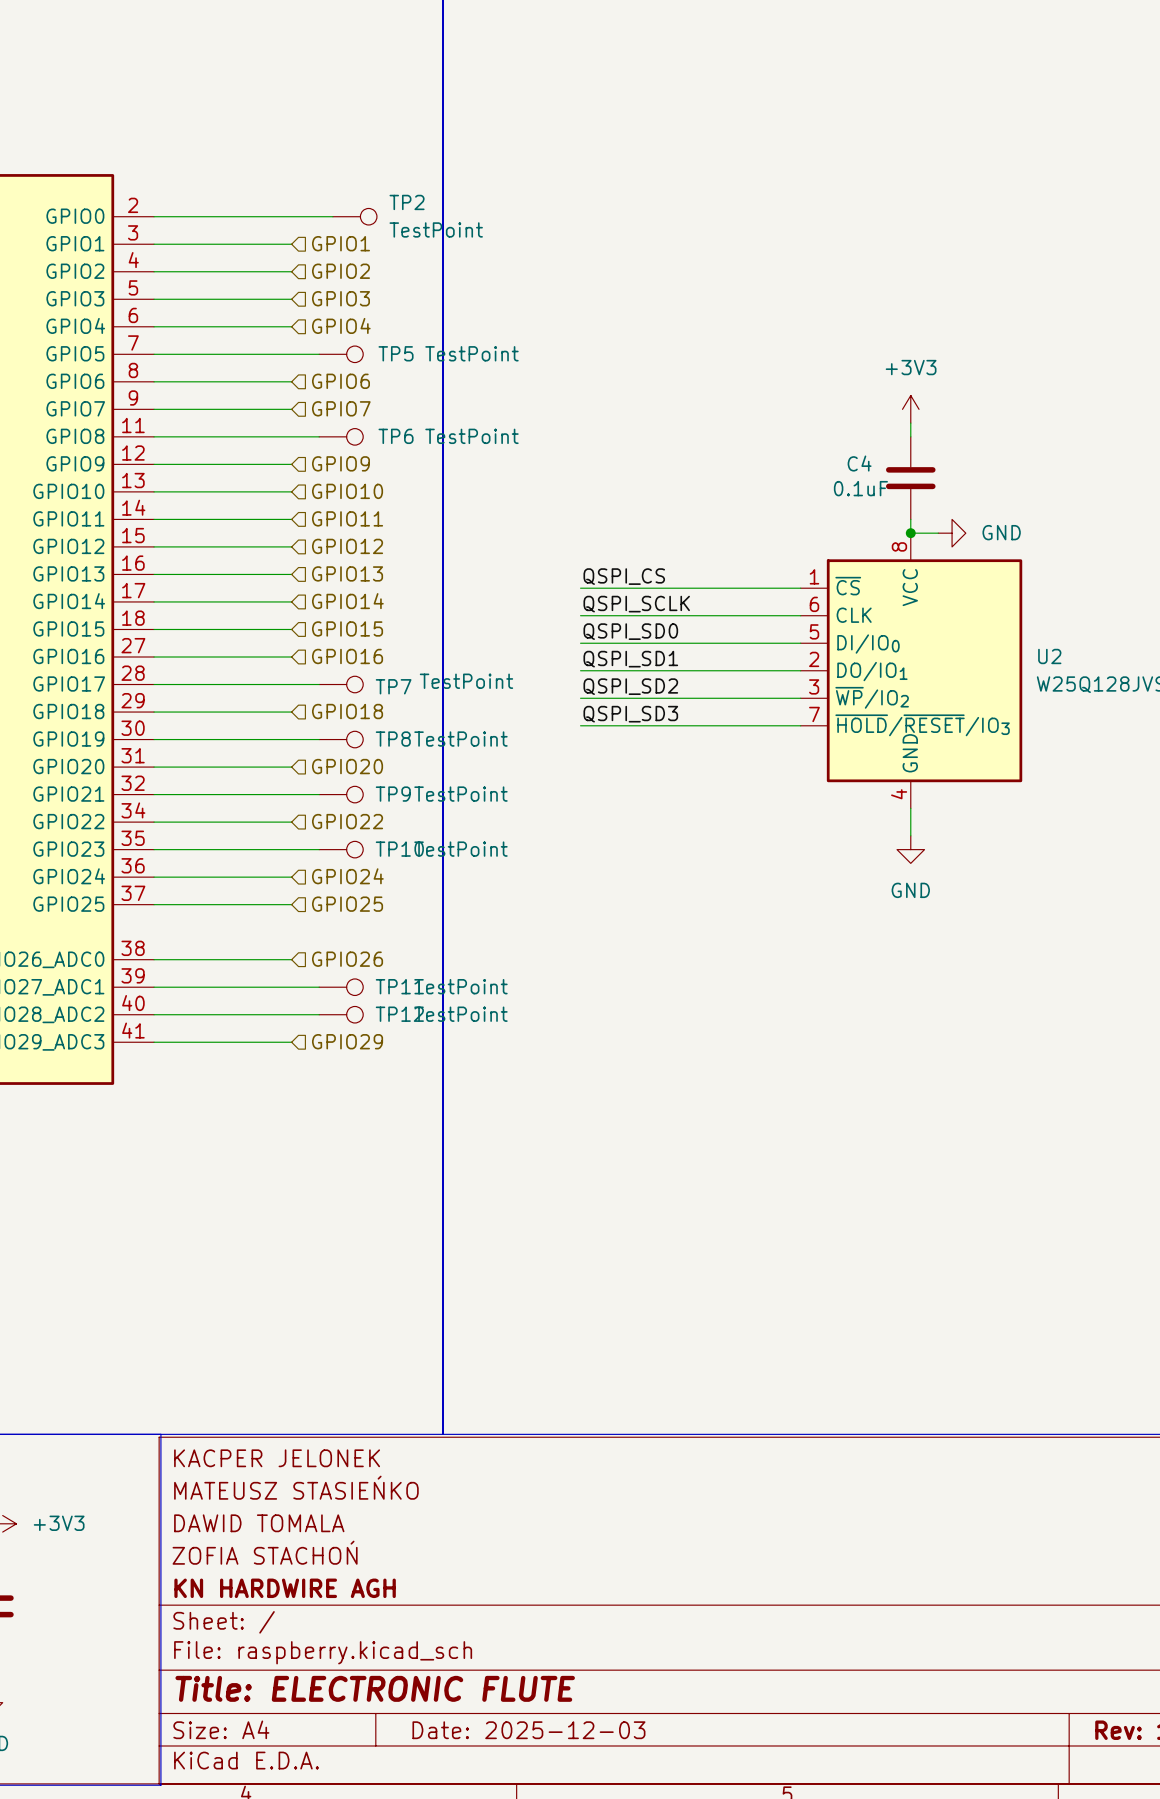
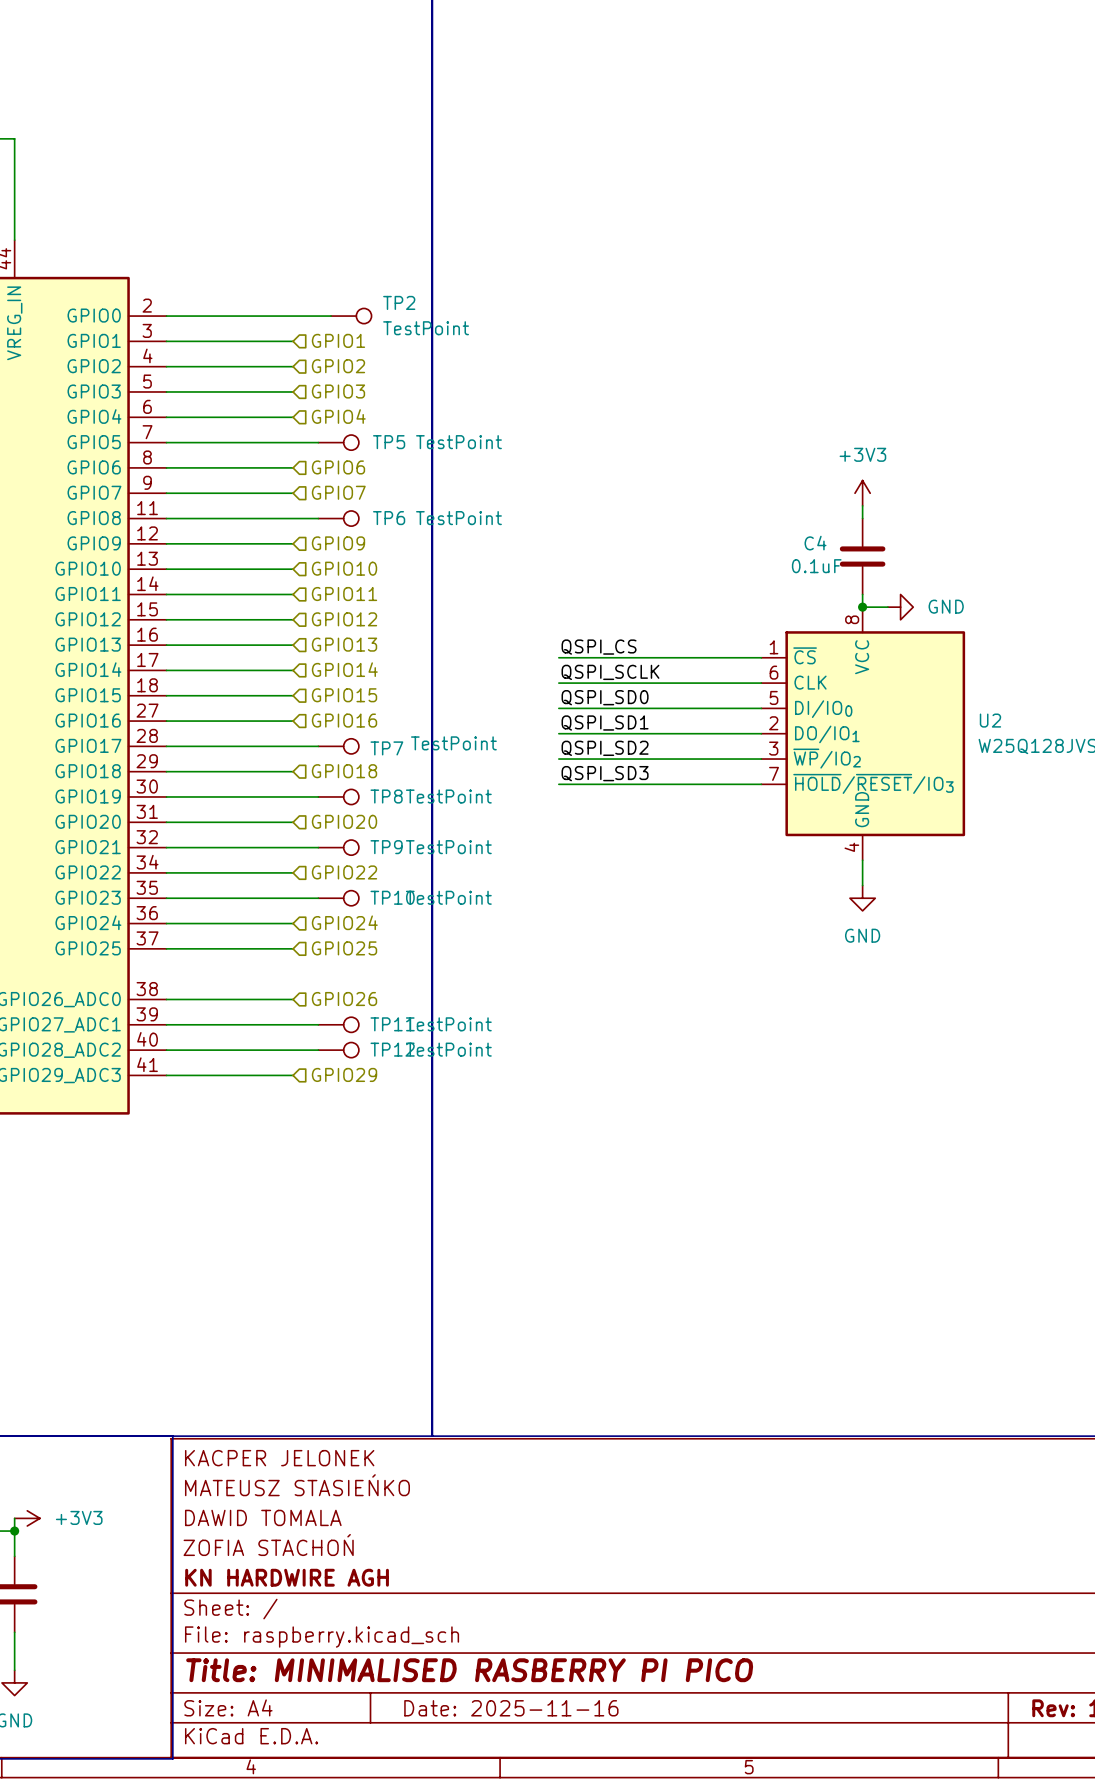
title block: Title: ELECTRONIC FLUTE (375, 1688) -> Title: MINIMALISED RASBERRY PI PICO (469, 1670)
title block: Date: 2025-12-03 (528, 1730) -> Date: 2025-11-16 (511, 1708)

